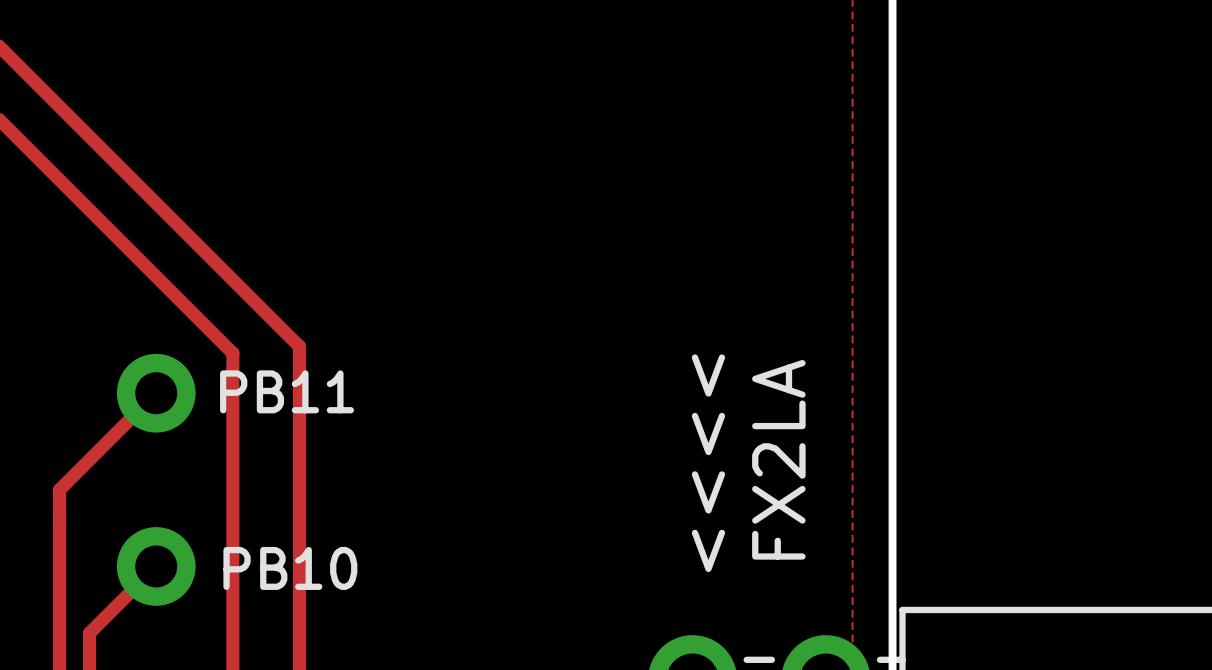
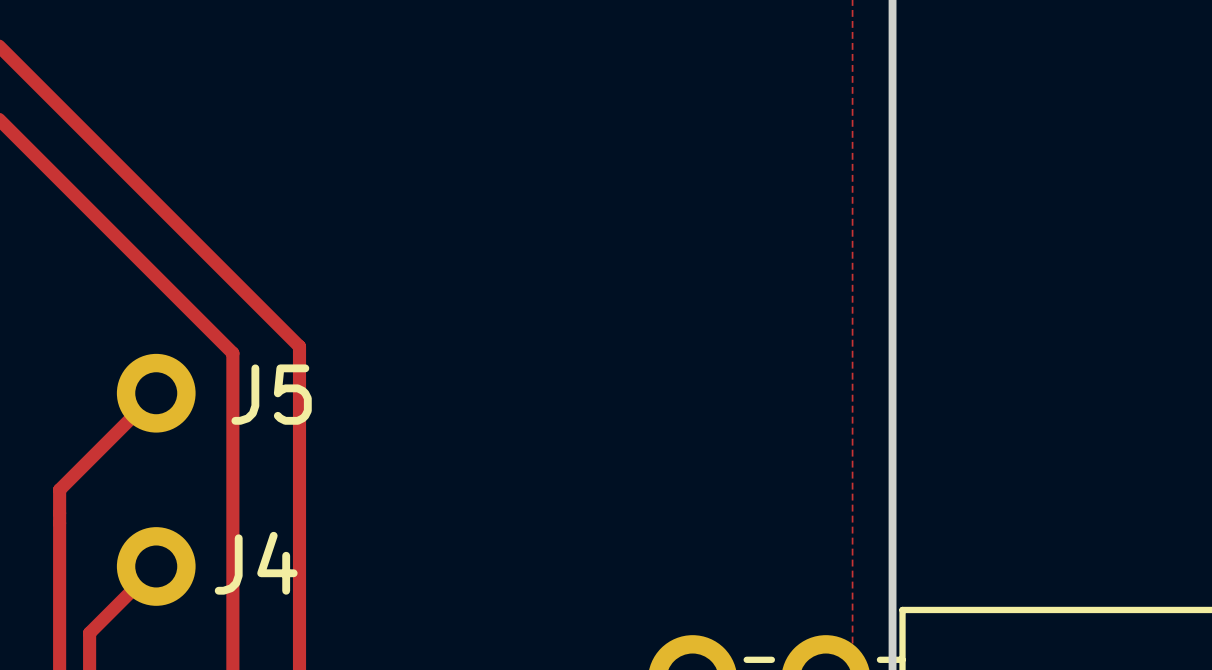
PB11 name: PB11 (287, 391) -> J5 (271, 394)
text: FX2LA (778, 459) -> none
text: <<<< (708, 463) -> none
PB10 name: PB10 (290, 568) -> J4 (256, 563)

